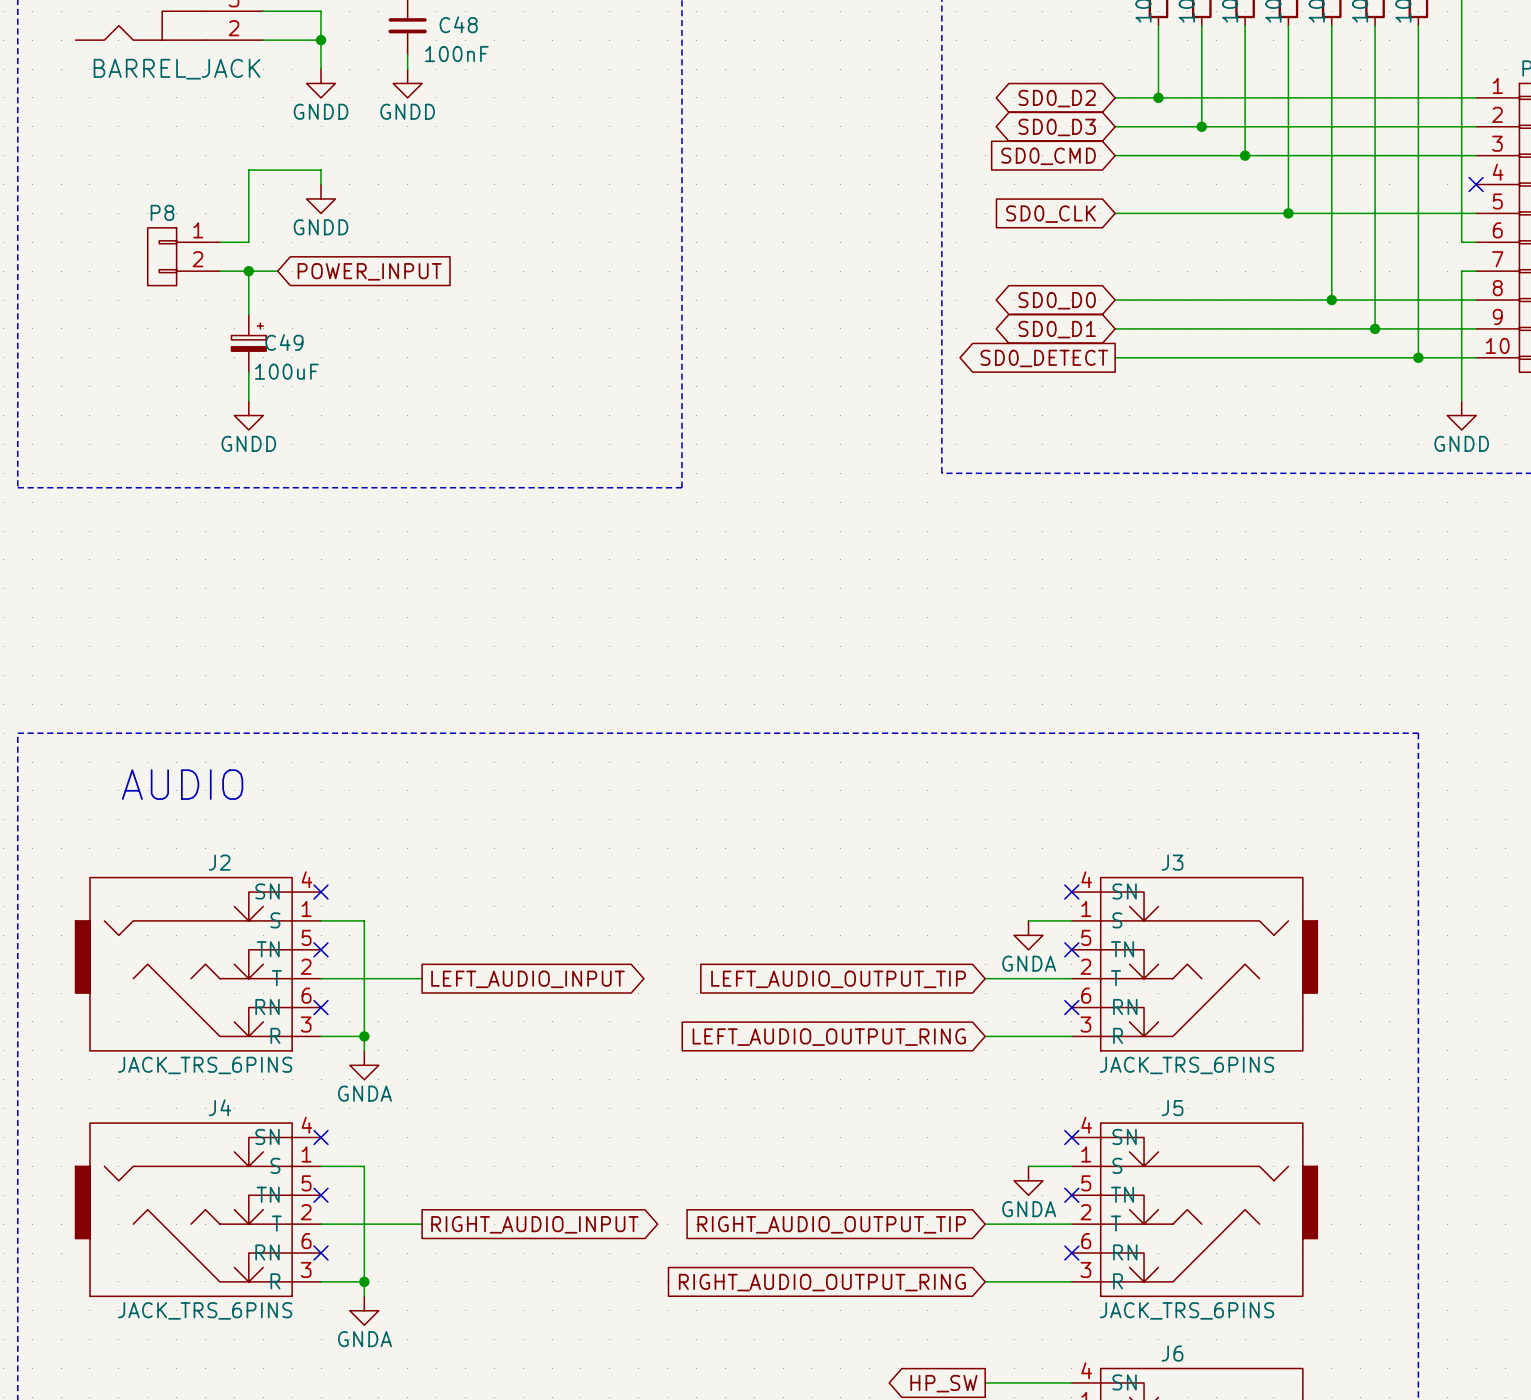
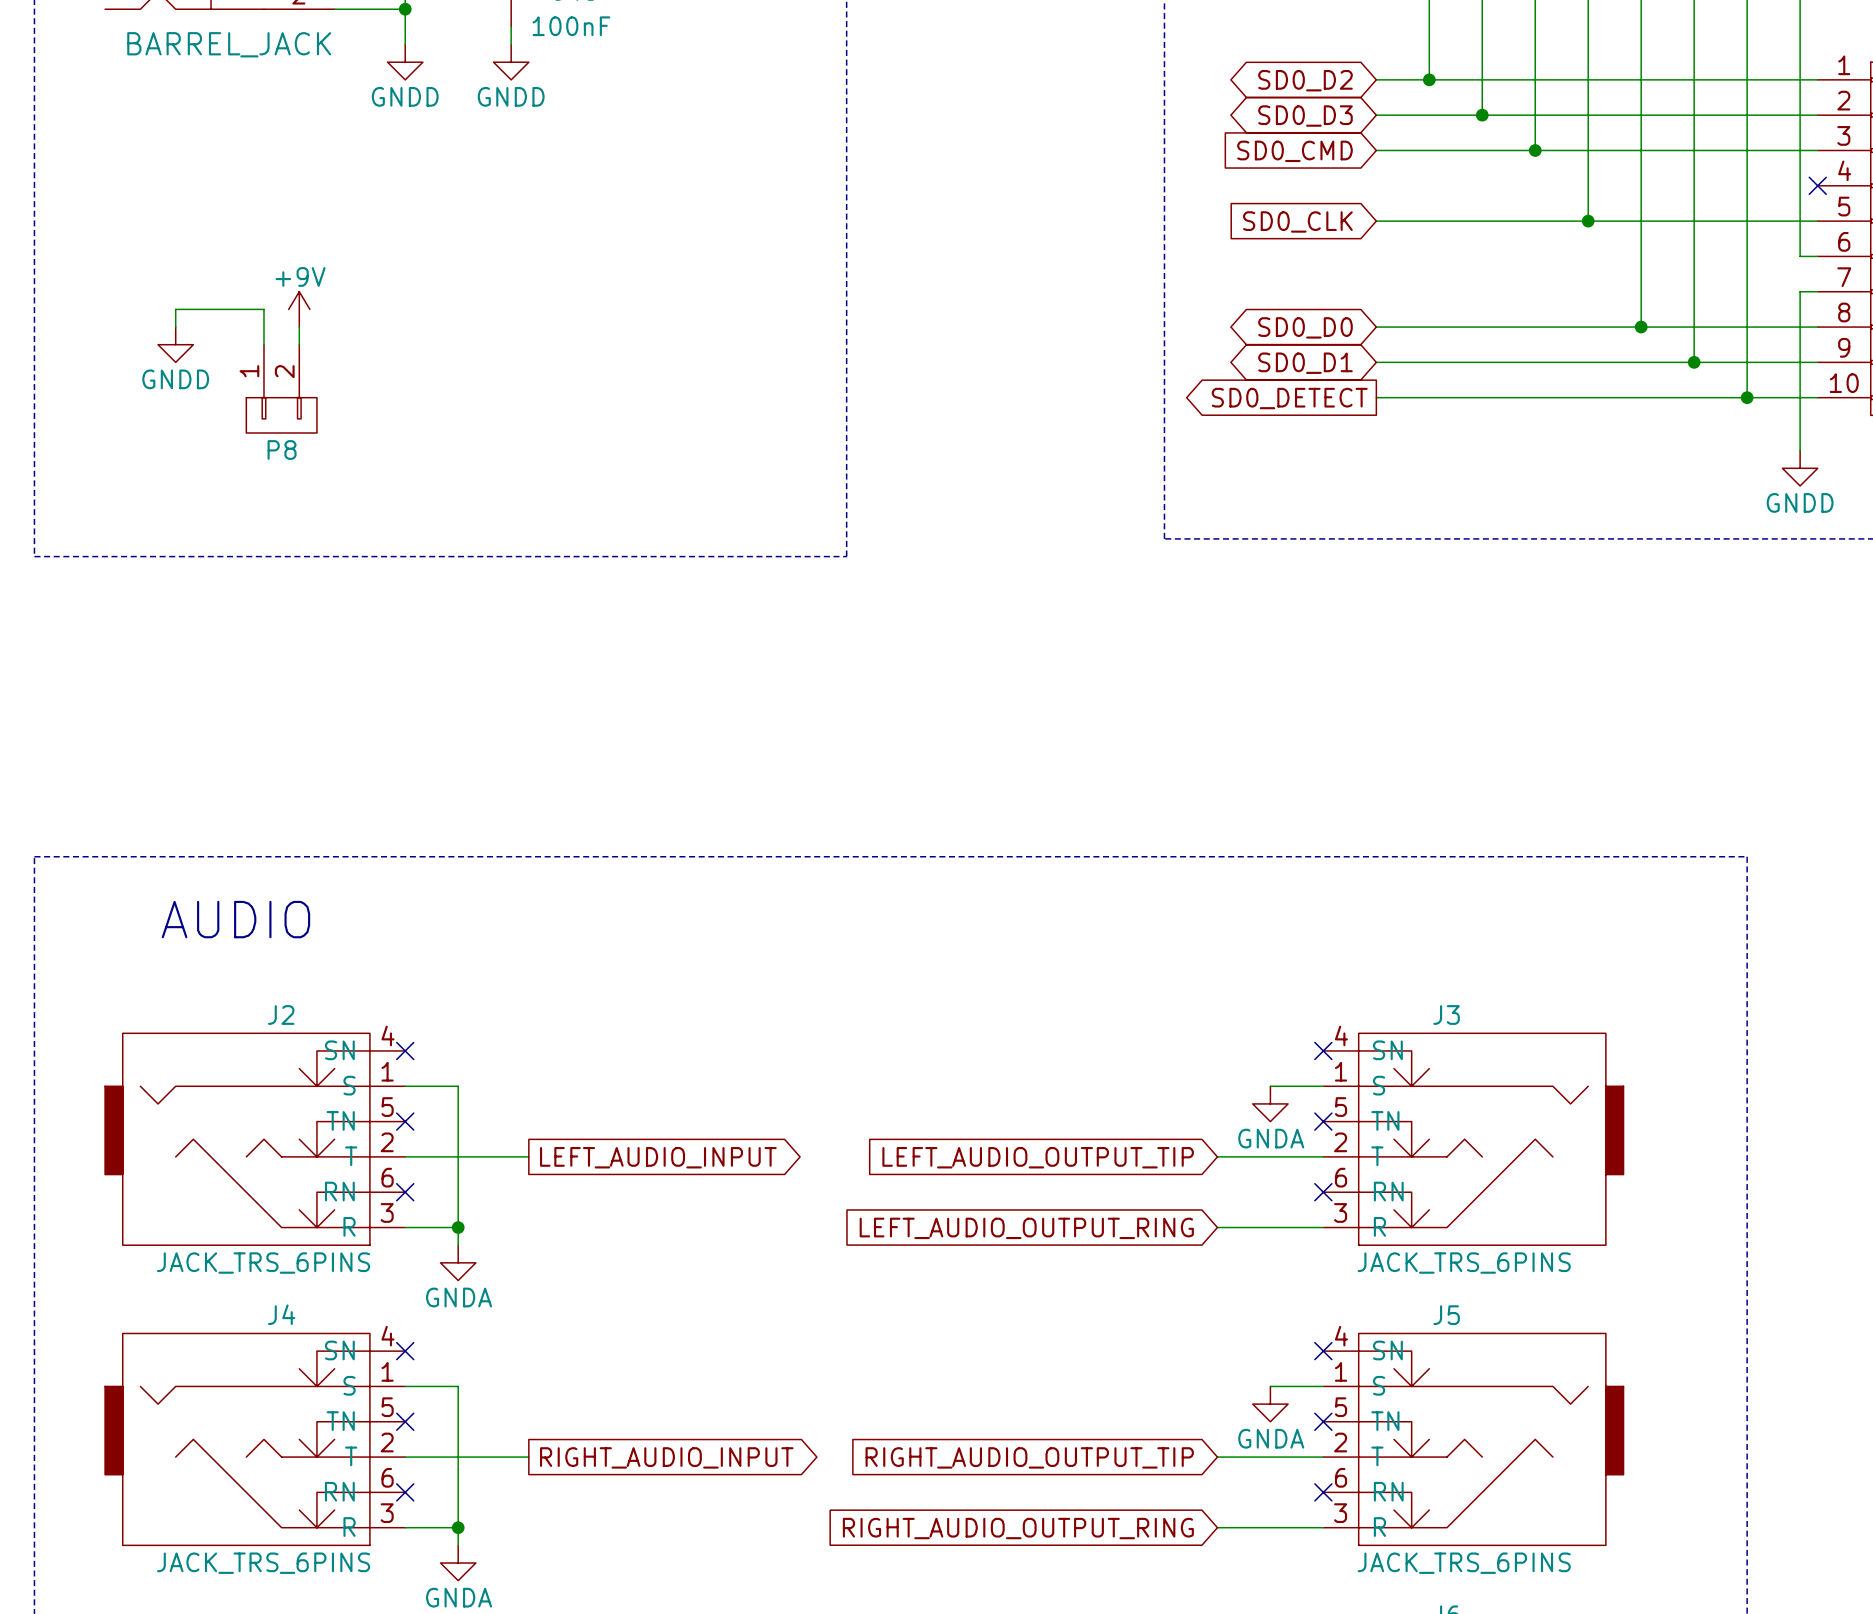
wire: (321, 184) (321, 170) (248, 170) (248, 242) (219, 242) -> none
power symbol: GNDD (321, 198) -> none
P8 name position: P8 (162, 212) -> P8 (282, 449)
P8 rotation: 0° (162, 256) -> 90° counterclockwise (281, 415)
P8 position: (183, 256) -> (281, 388)
wire: (219, 271) (277, 271) -> none
wire: (248, 271) (248, 314) -> none
junction: (248, 271) -> none
global label: POWER_INPUT (369, 271) -> none
power symbol: none -> +9V (299, 309)
wire: none -> (175, 327) (175, 309) (263, 309) (263, 344)
wire: none -> (299, 327) (299, 344)
power symbol: none -> GNDD (175, 344)
C49: 100uF (248, 343) -> none
wire: (248, 372) (248, 401) -> none
power symbol: GNDD (248, 415) -> none

